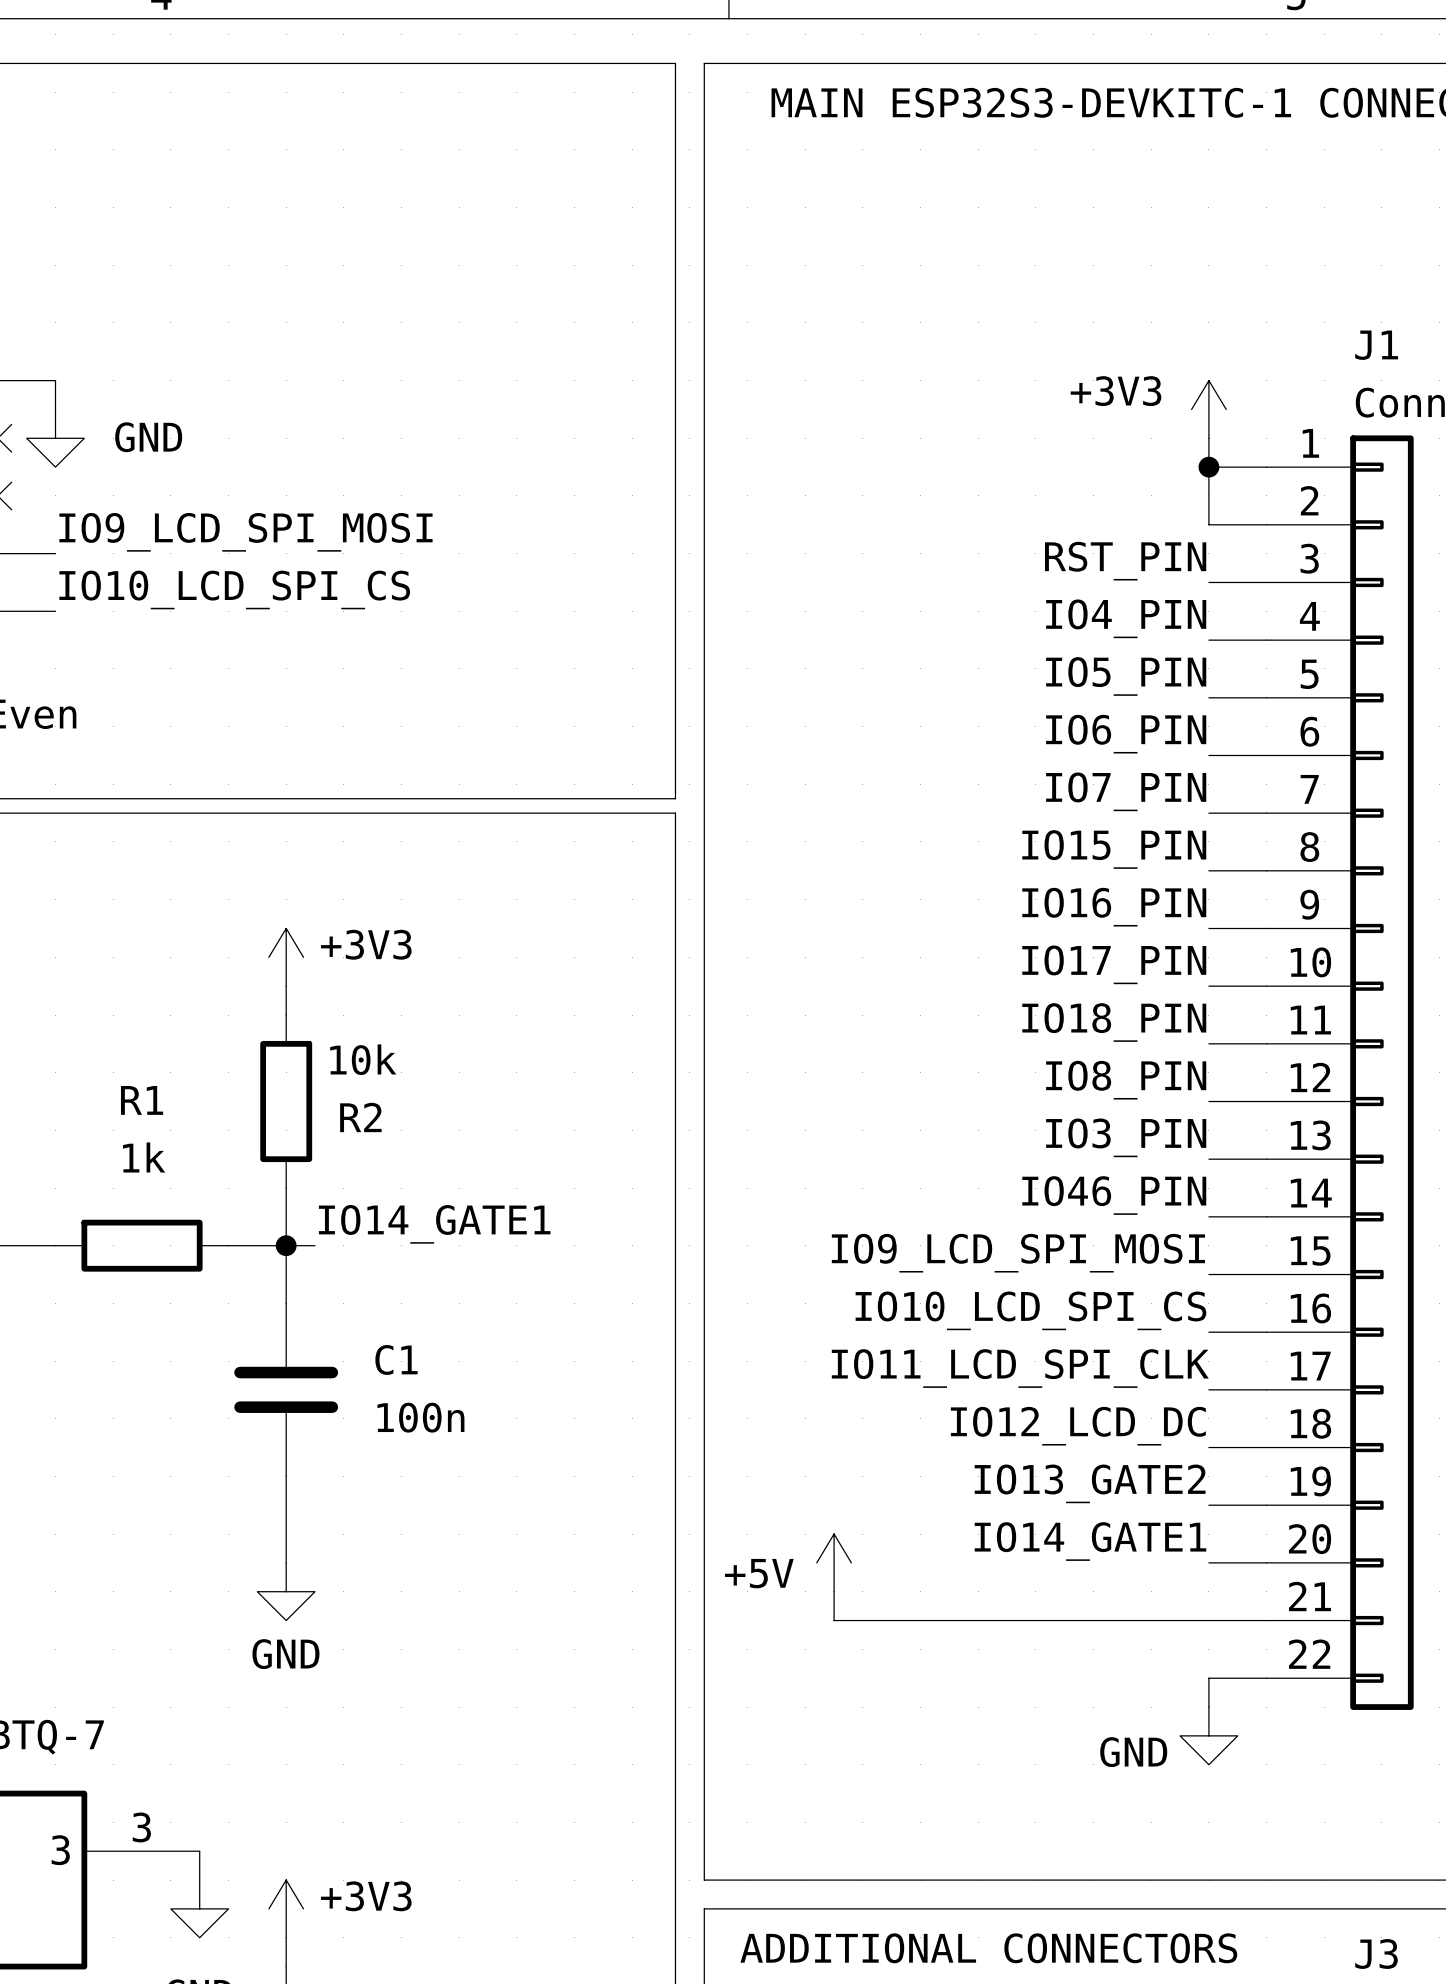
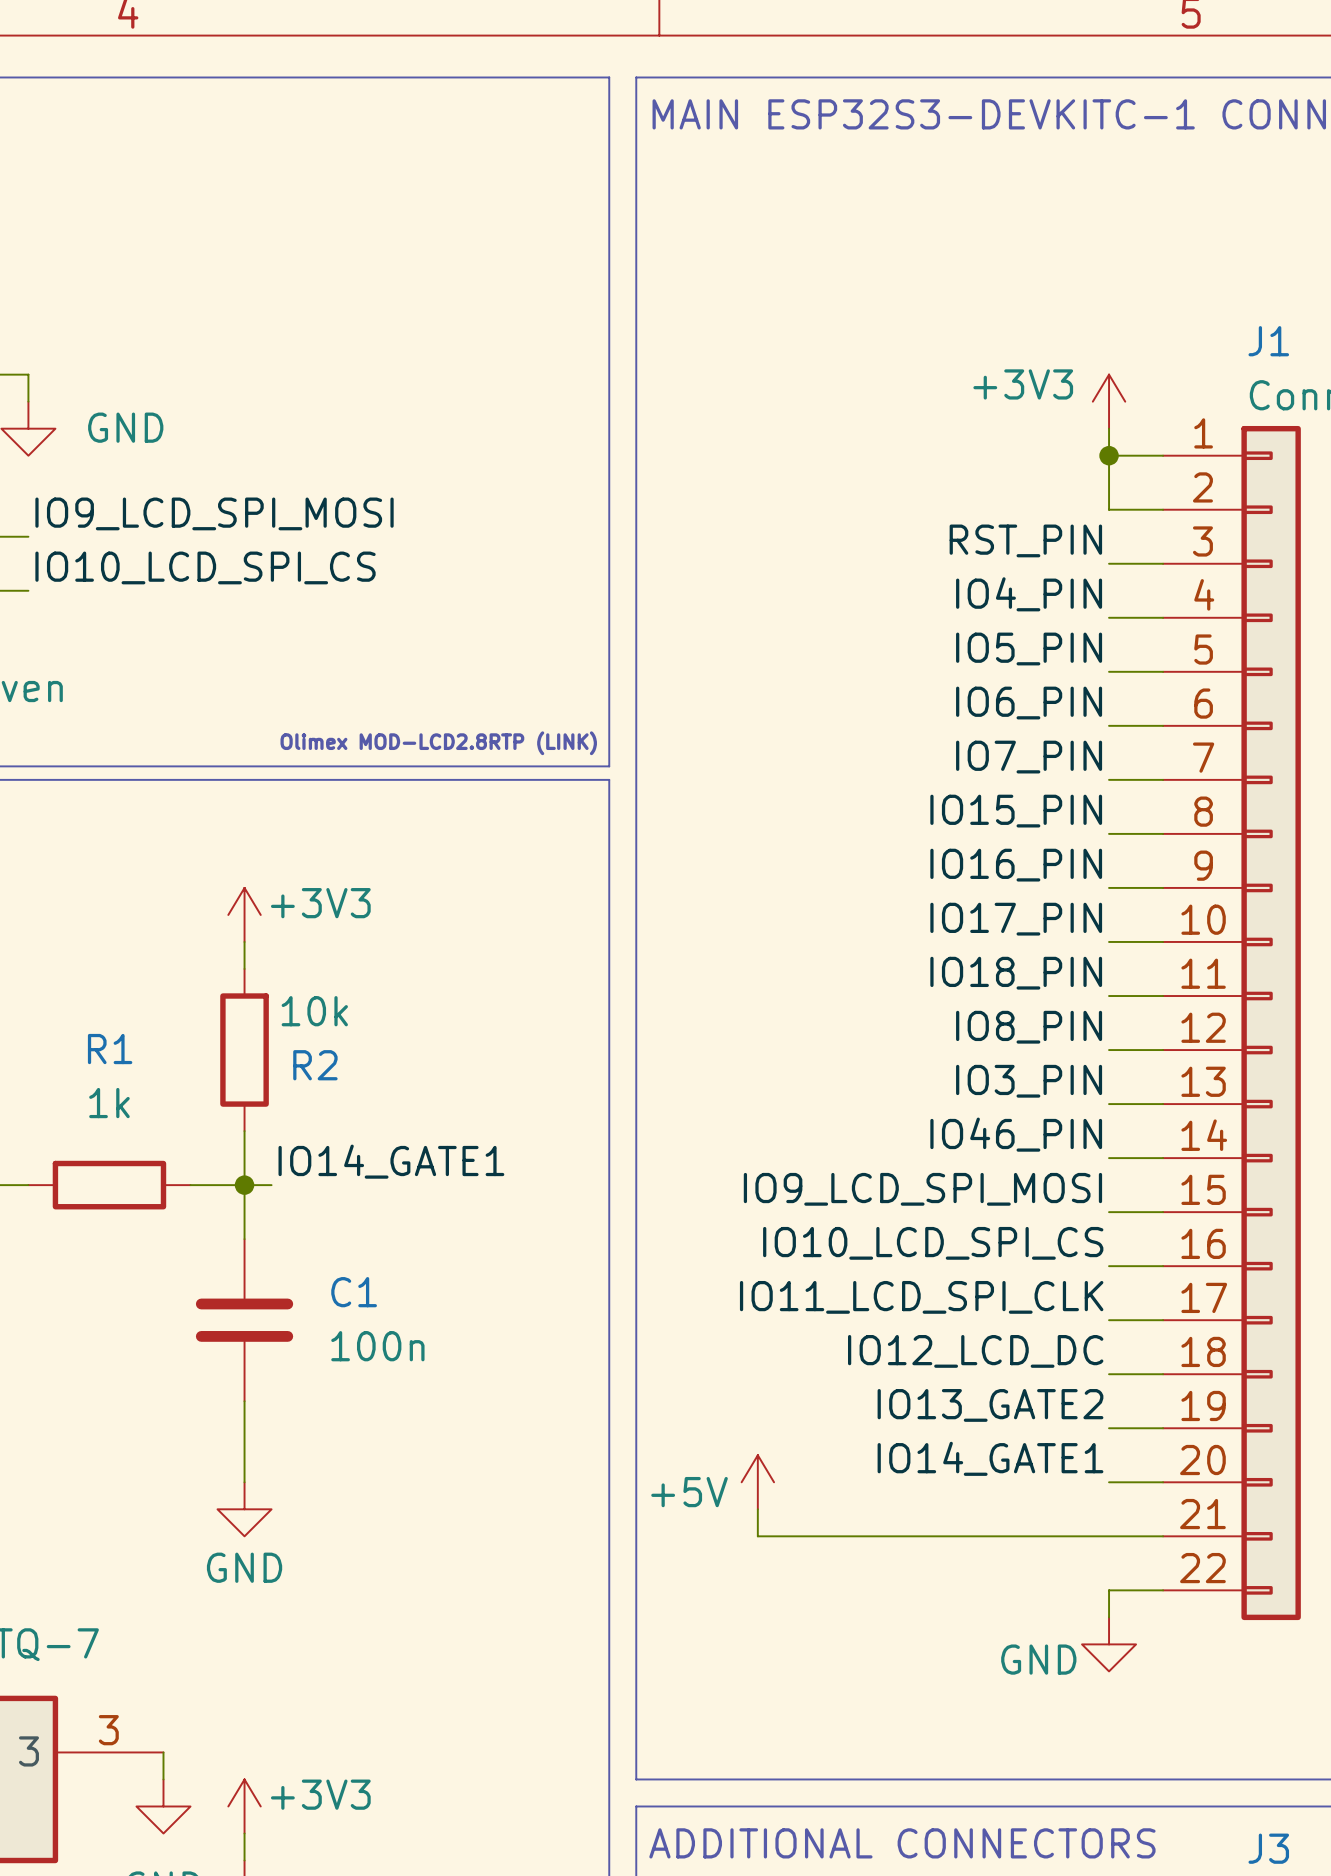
text: none -> Olimex MOD-LCD2.8RTP (LINK) (438, 743)

